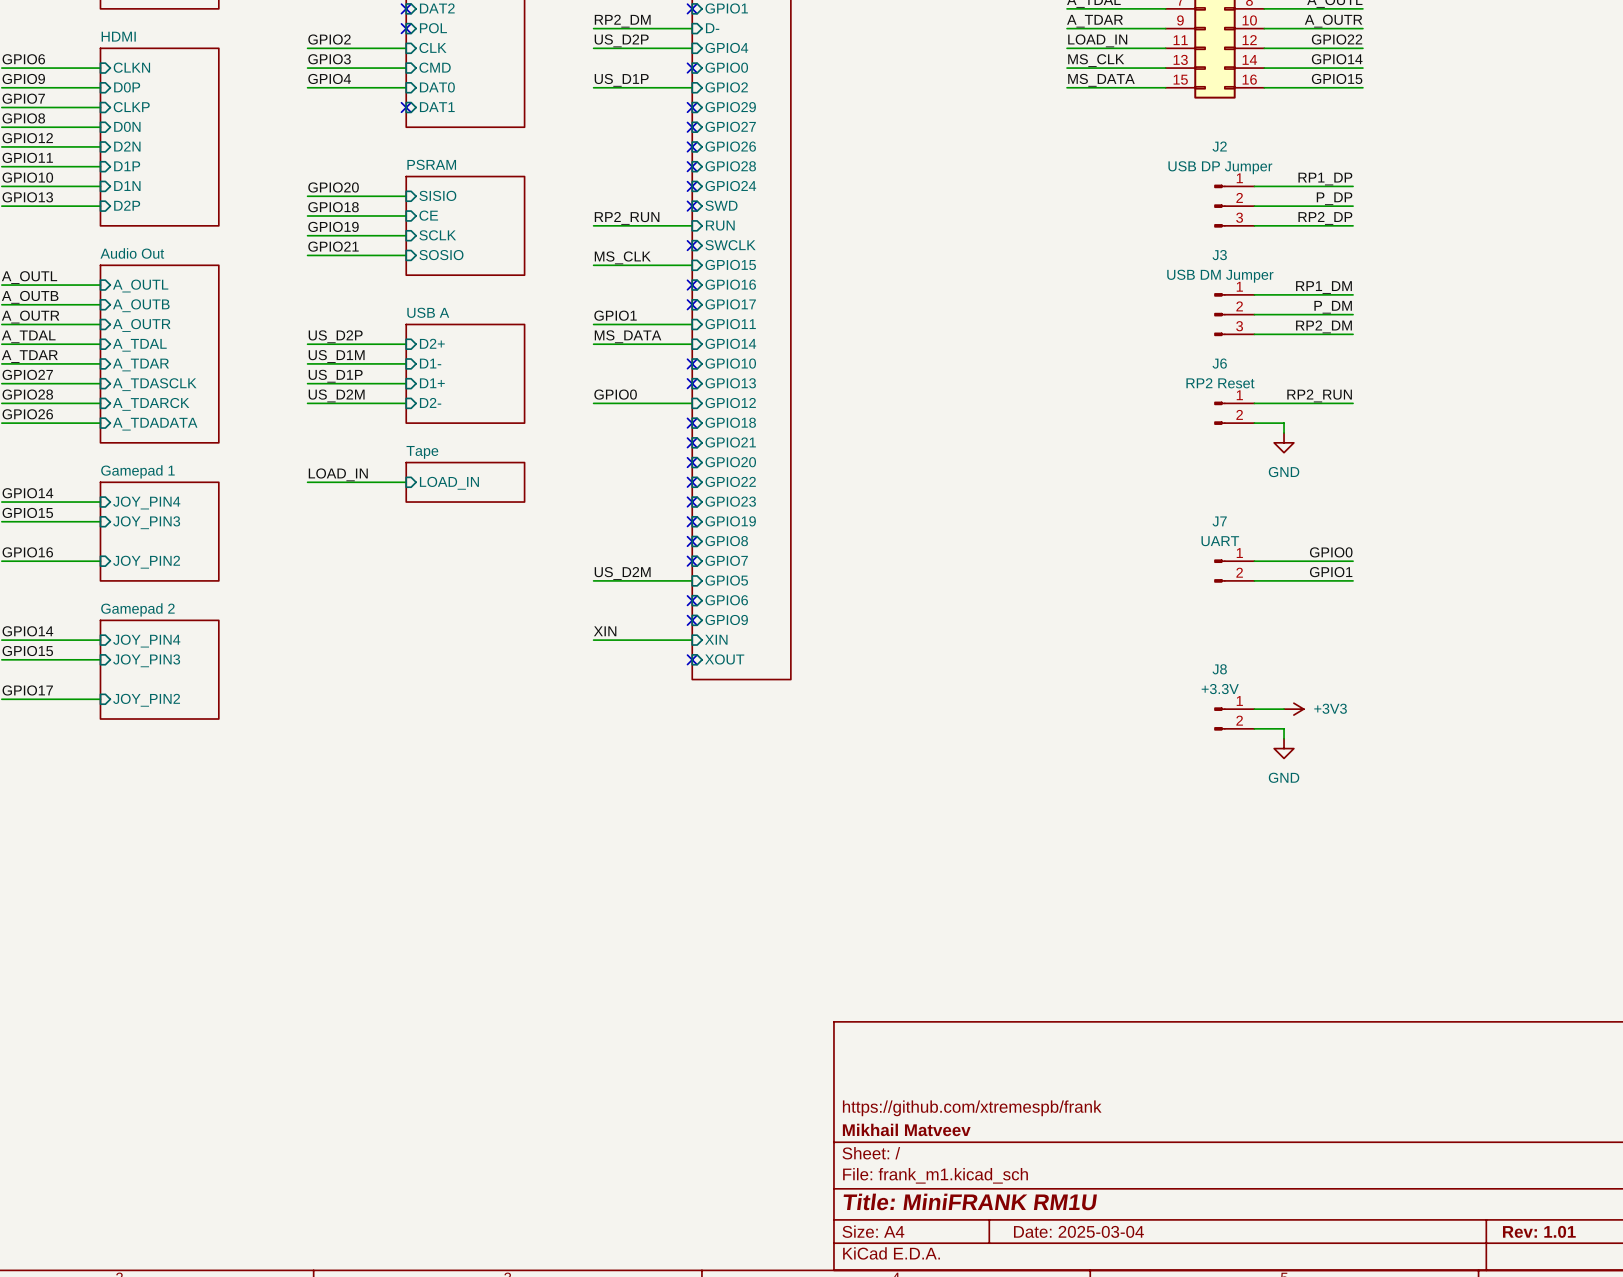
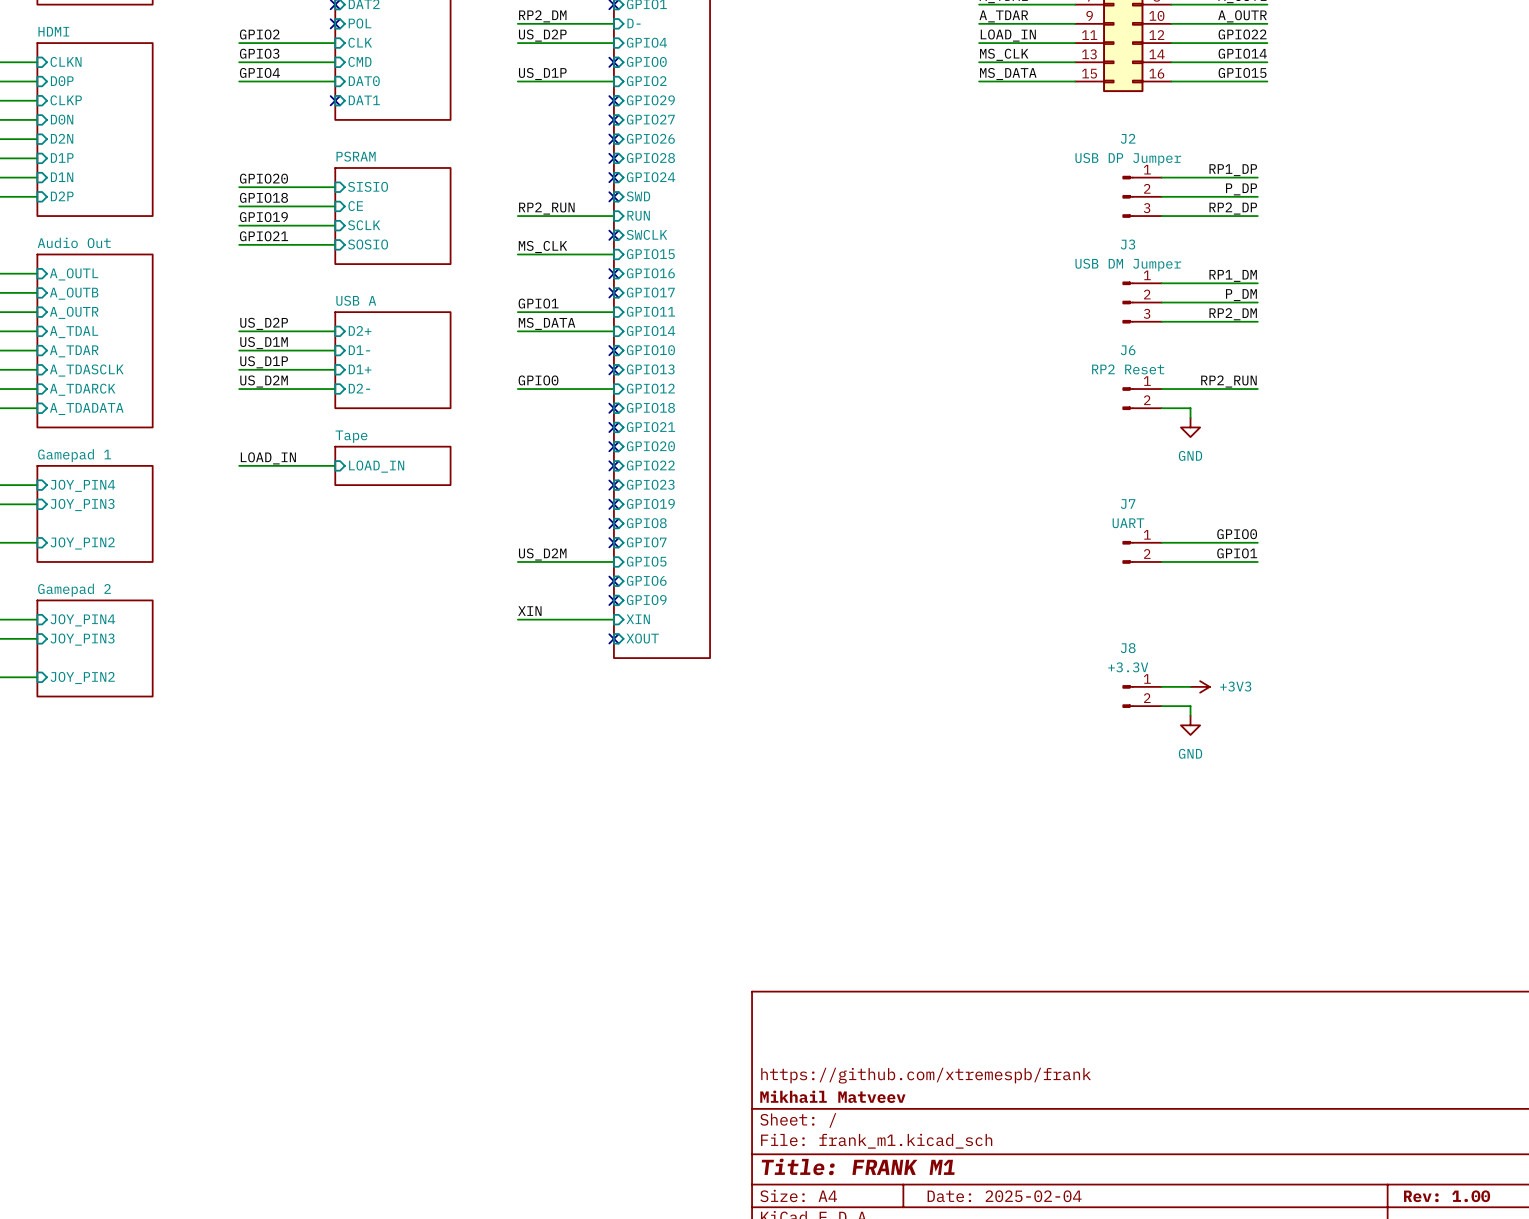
title block: Title: MiniFRANK RM1U (970, 1201) -> Title: FRANK M1 (858, 1166)
title block: Date: 2025-03-04 (1078, 1231) -> Date: 2025-02-04 (1004, 1196)
title block: Rev: 1.01 (1539, 1231) -> Rev: 1.00 (1447, 1196)

